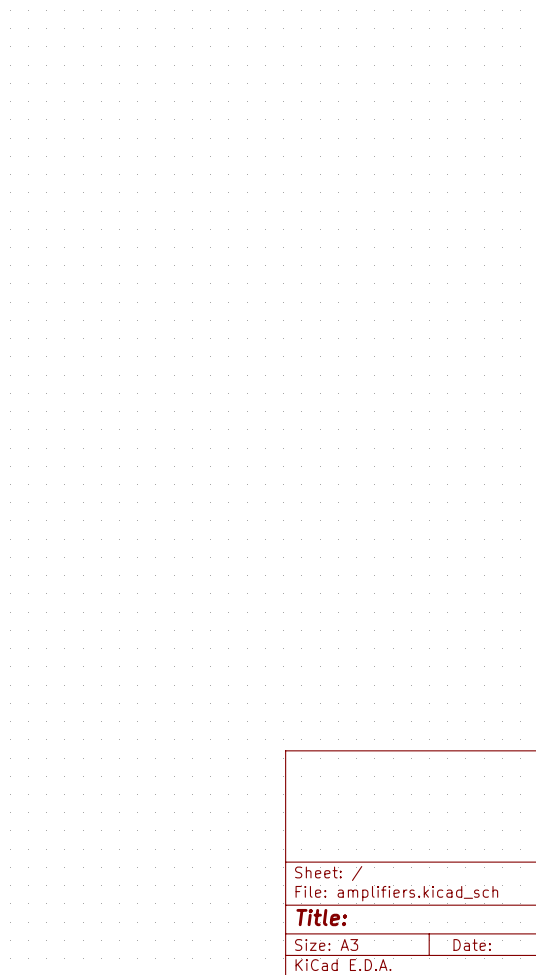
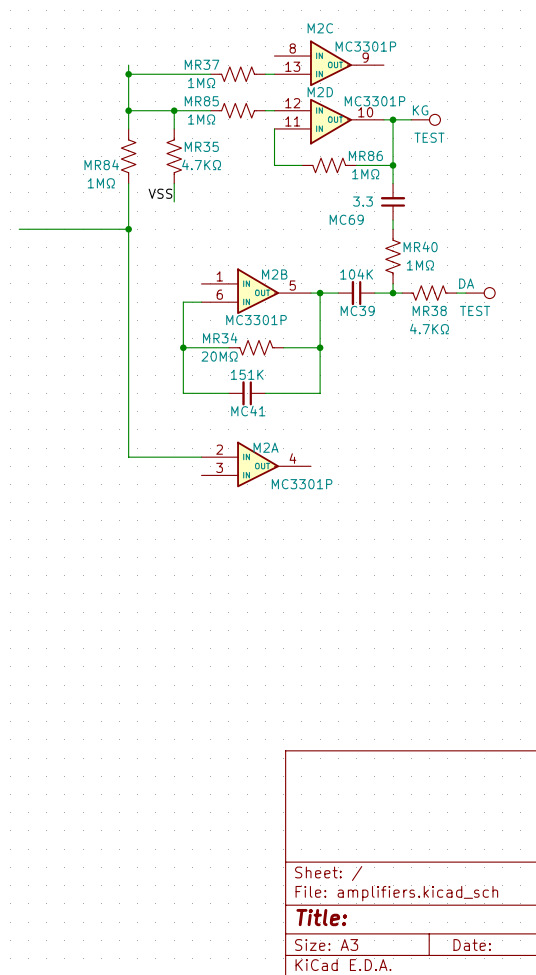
M2C: none -> MC3301P (329, 63)
wire: none -> (128, 65) (128, 128)
wire: none -> (128, 74) (210, 74)
junction: none -> (128, 74)
MR37: none -> 1MΩ (238, 74)
wire: none -> (265, 74) (274, 74)
wire: none -> (128, 110) (210, 110)
junction: none -> (128, 110)
wire: none -> (174, 110) (174, 128)
junction: none -> (174, 110)
MR85: none -> 1MΩ (238, 110)
wire: none -> (265, 110) (274, 110)
wire: none -> (383, 119) (411, 119)
wire: none -> (393, 119) (393, 183)
junction: none -> (393, 119)
TEST: none -> KG (425, 119)
M2D: none -> MC3301P (329, 121)
wire: none -> (274, 128) (274, 165) (301, 165)
MR84: none -> 1MΩ (128, 156)
MR35: none -> 4.7KΩ (174, 156)
MR86: none -> 1MΩ (329, 165)
wire: none -> (356, 165) (393, 165)
junction: none -> (393, 165)
wire: none -> (128, 183) (128, 457) (201, 457)
wire: none -> (174, 183) (174, 201)
label: none -> VSS (160, 193)
MC69: none -> 3.3 (393, 201)
wire: none -> (393, 220) (393, 229)
wire: none -> (19, 229) (128, 229)
junction: none -> (128, 229)
MR40: none -> 1MΩ (393, 256)
wire: none -> (393, 283) (393, 293)
M2B: none -> MC3301P (256, 291)
wire: none -> (310, 293) (338, 293)
wire: none -> (320, 293) (320, 393) (265, 393)
junction: none -> (320, 293)
MC39: none -> 104K (356, 293)
wire: none -> (374, 293) (402, 293)
junction: none -> (393, 293)
MR38: none -> 4.7KΩ (429, 293)
wire: none -> (456, 293) (465, 293)
TEST: none -> DA (480, 293)
wire: none -> (201, 302) (183, 302) (183, 393) (228, 393)
wire: none -> (183, 347) (228, 347)
junction: none -> (183, 347)
MR34: none -> 20MΩ (256, 347)
wire: none -> (283, 347) (320, 347)
junction: none -> (320, 347)
MC41: none -> 151K (247, 393)
M2A: none -> MC3301P (256, 464)

